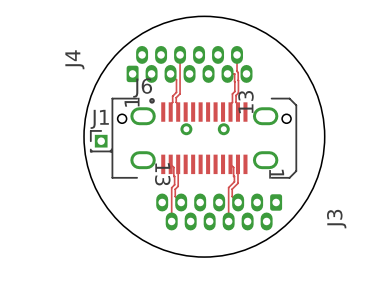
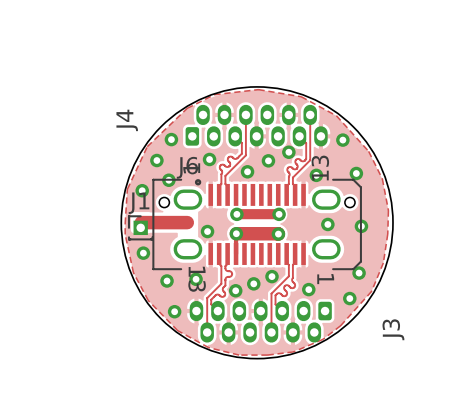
zone outline: none -> (258, 89) (214, 94) (187, 108) (147, 146) (127, 189) (125, 234) (133, 272) (148, 300) (177, 330) (208, 347) (239, 355) (267, 355) (293, 351) (322, 339) (340, 325) (371, 291) (383, 262) (387, 234) (388, 210) (382, 178) (368, 151) (336, 115) (301, 96) (258, 89)
track: (180, 54) (180, 93) (176, 97) -> (245, 114) (245, 155) (225, 175) (225, 178)
track: (237, 54) (238, 93) (236, 96) -> (310, 114) (310, 160) (292, 177)
via: none -> (171, 139)
via: none -> (342, 140)
J4 position: (189, 64) -> (256, 125)
track: (170, 73) (176, 79) (176, 92) (172, 96) -> (235, 136) (241, 143) (241, 153) (236, 158) (228, 157) (228, 166) (220, 165) (221, 177)
via: none -> (288, 152)
track: (234, 74) (234, 91) (232, 95) -> (299, 136) (306, 143) (306, 159) (302, 161) (296, 159) (296, 168) (290, 166) (287, 168) (288, 176)
via: none -> (209, 159)
via: none -> (156, 160)
via: none -> (268, 160)
via: none -> (247, 171)
via: none -> (356, 173)
via: none -> (316, 175)
via: none -> (168, 180)
via: none -> (142, 190)
track: none -> (236, 214) (277, 214)
track: none -> (141, 222) (187, 222)
via: none -> (327, 224)
via: none -> (361, 226)
via: none -> (207, 231)
via: none -> (236, 233)
track: none -> (278, 234) (236, 233) (236, 253)
via: none -> (278, 234)
via: none -> (143, 253)
track: (170, 164) (173, 167) (174, 176) (174, 184) (171, 187) (171, 221) -> (219, 253) (221, 283) (207, 298) (207, 332)
track: (230, 164) (233, 167) (234, 181) (228, 187) (228, 221) -> (286, 253) (288, 276) (271, 293) (271, 332)
track: (237, 172) (237, 183) (232, 189) (232, 196) (238, 202) -> (295, 262) (292, 264) (292, 279) (294, 286) (291, 288) (285, 285) (284, 287) (286, 295) (278, 293) (275, 295) (275, 304) (282, 311)
track: (178, 173) (178, 186) (175, 189) (175, 196) (181, 202) -> (227, 263) (225, 269) (232, 274) (225, 278) (225, 285) (222, 289) (225, 295) (222, 296) (216, 294) (211, 299) (211, 304) (217, 311)
via: none -> (359, 273)
via: none -> (271, 276)
via: none -> (196, 279)
via: none -> (167, 281)
via: none -> (253, 283)
via: none -> (308, 289)
via: none -> (235, 290)
via: none -> (349, 298)
J3 position: (219, 211) -> (260, 321)
via: none -> (174, 311)

